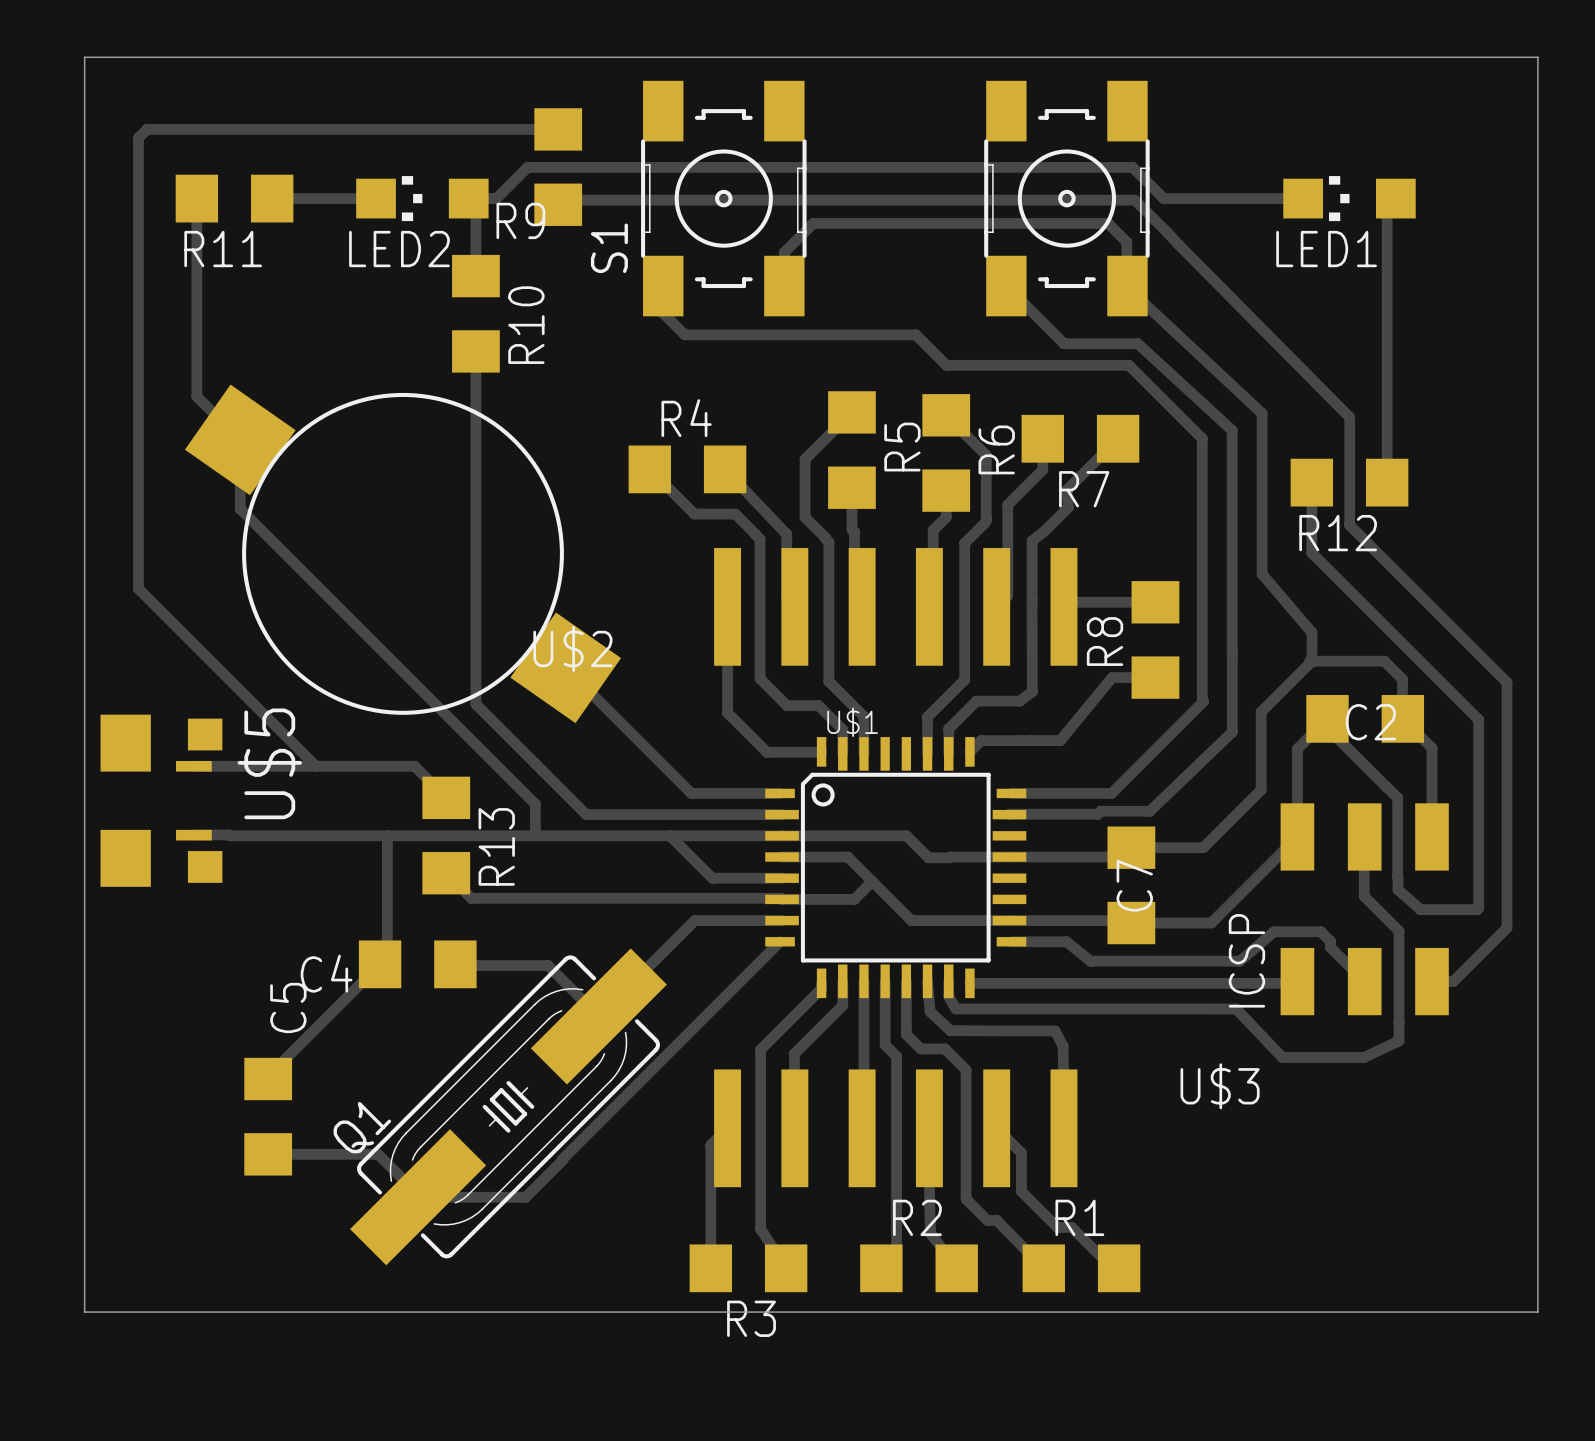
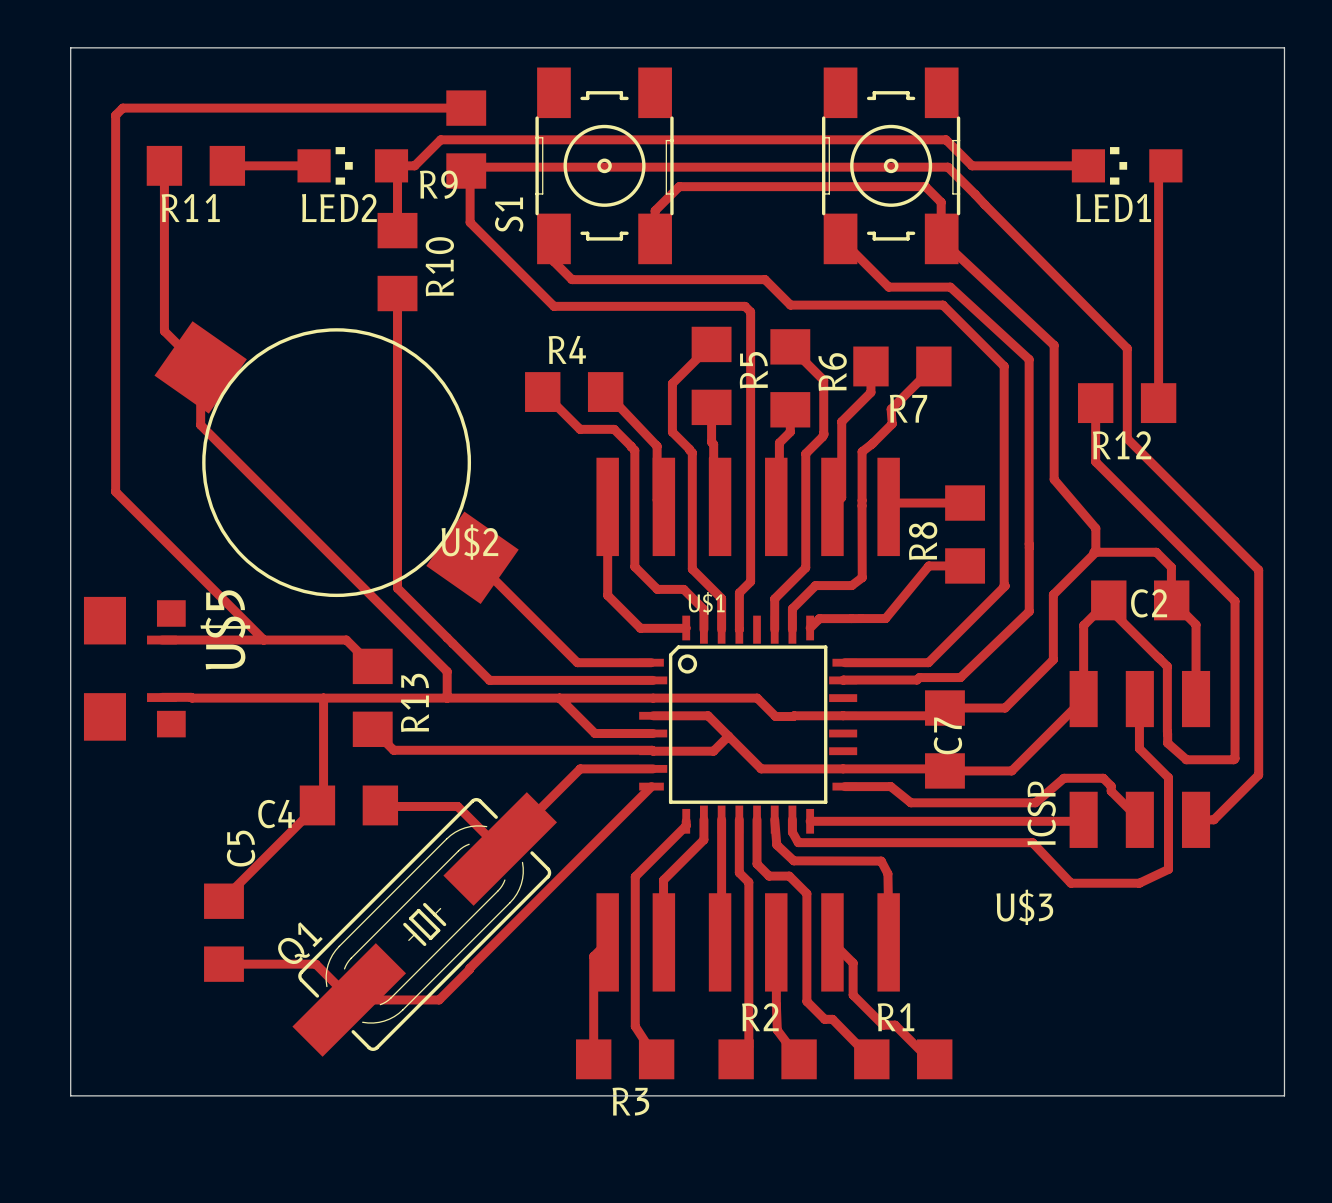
track: none -> (470, 167) (470, 222) (553, 306) (745, 306) (750, 311) (750, 581) (739, 592) (739, 629)

